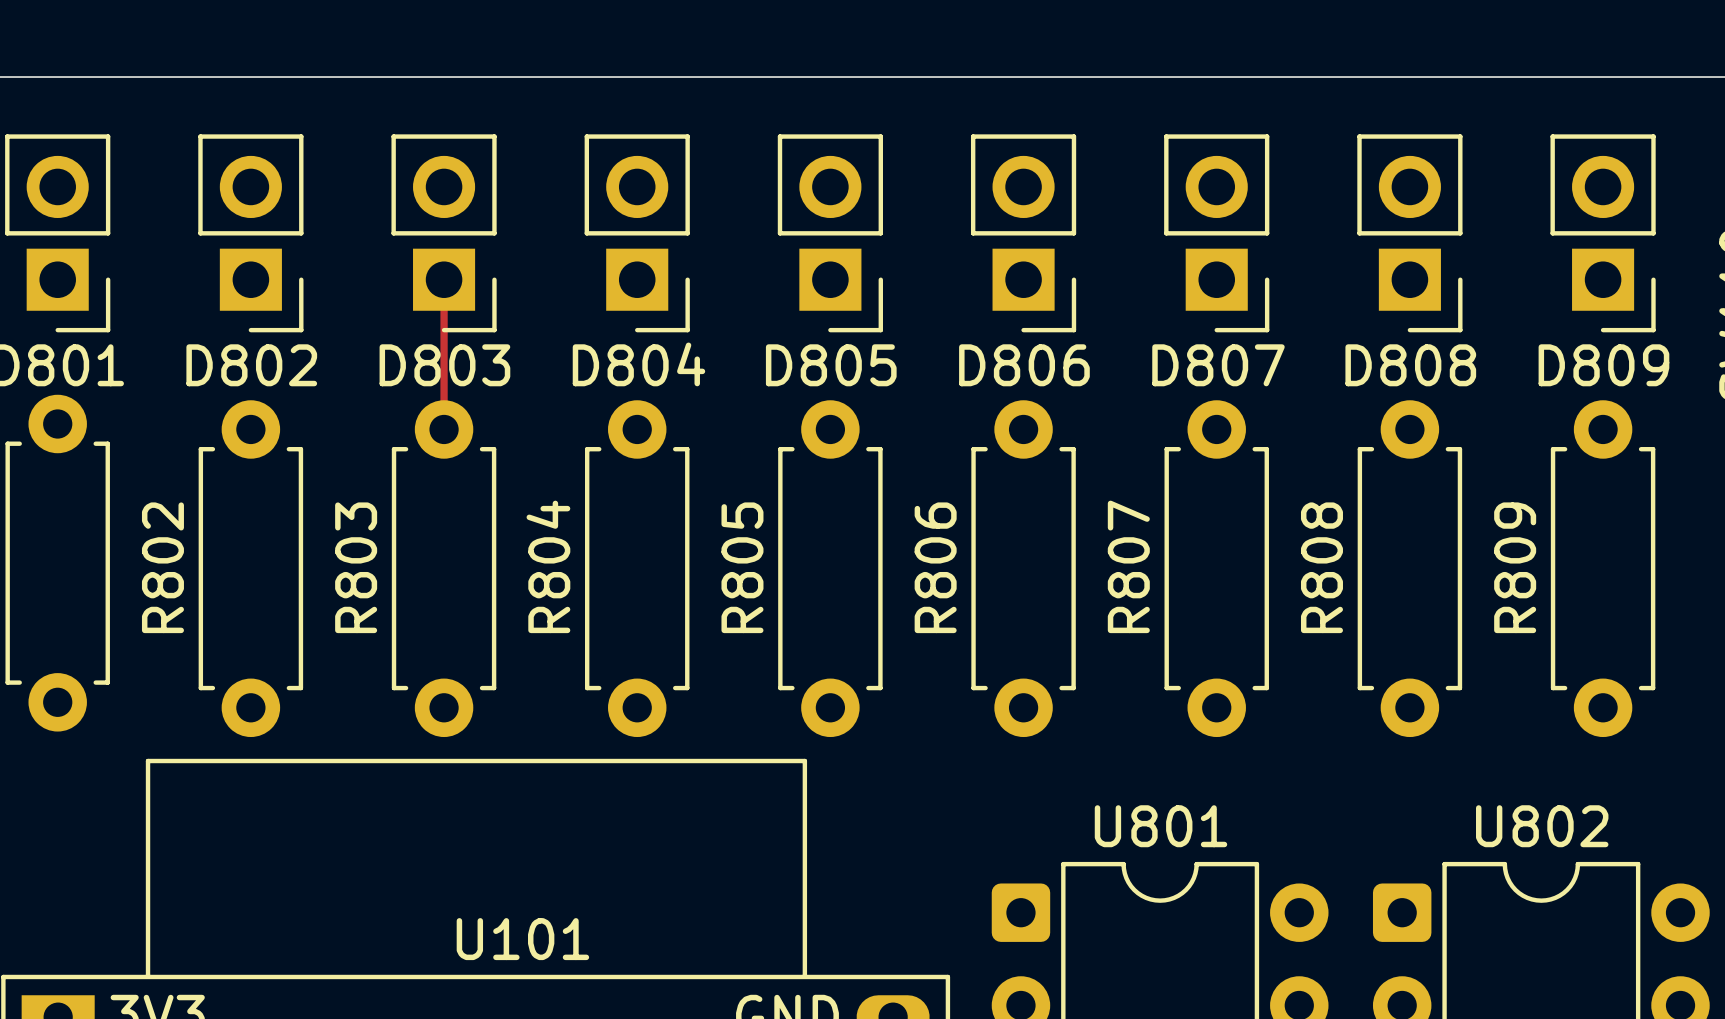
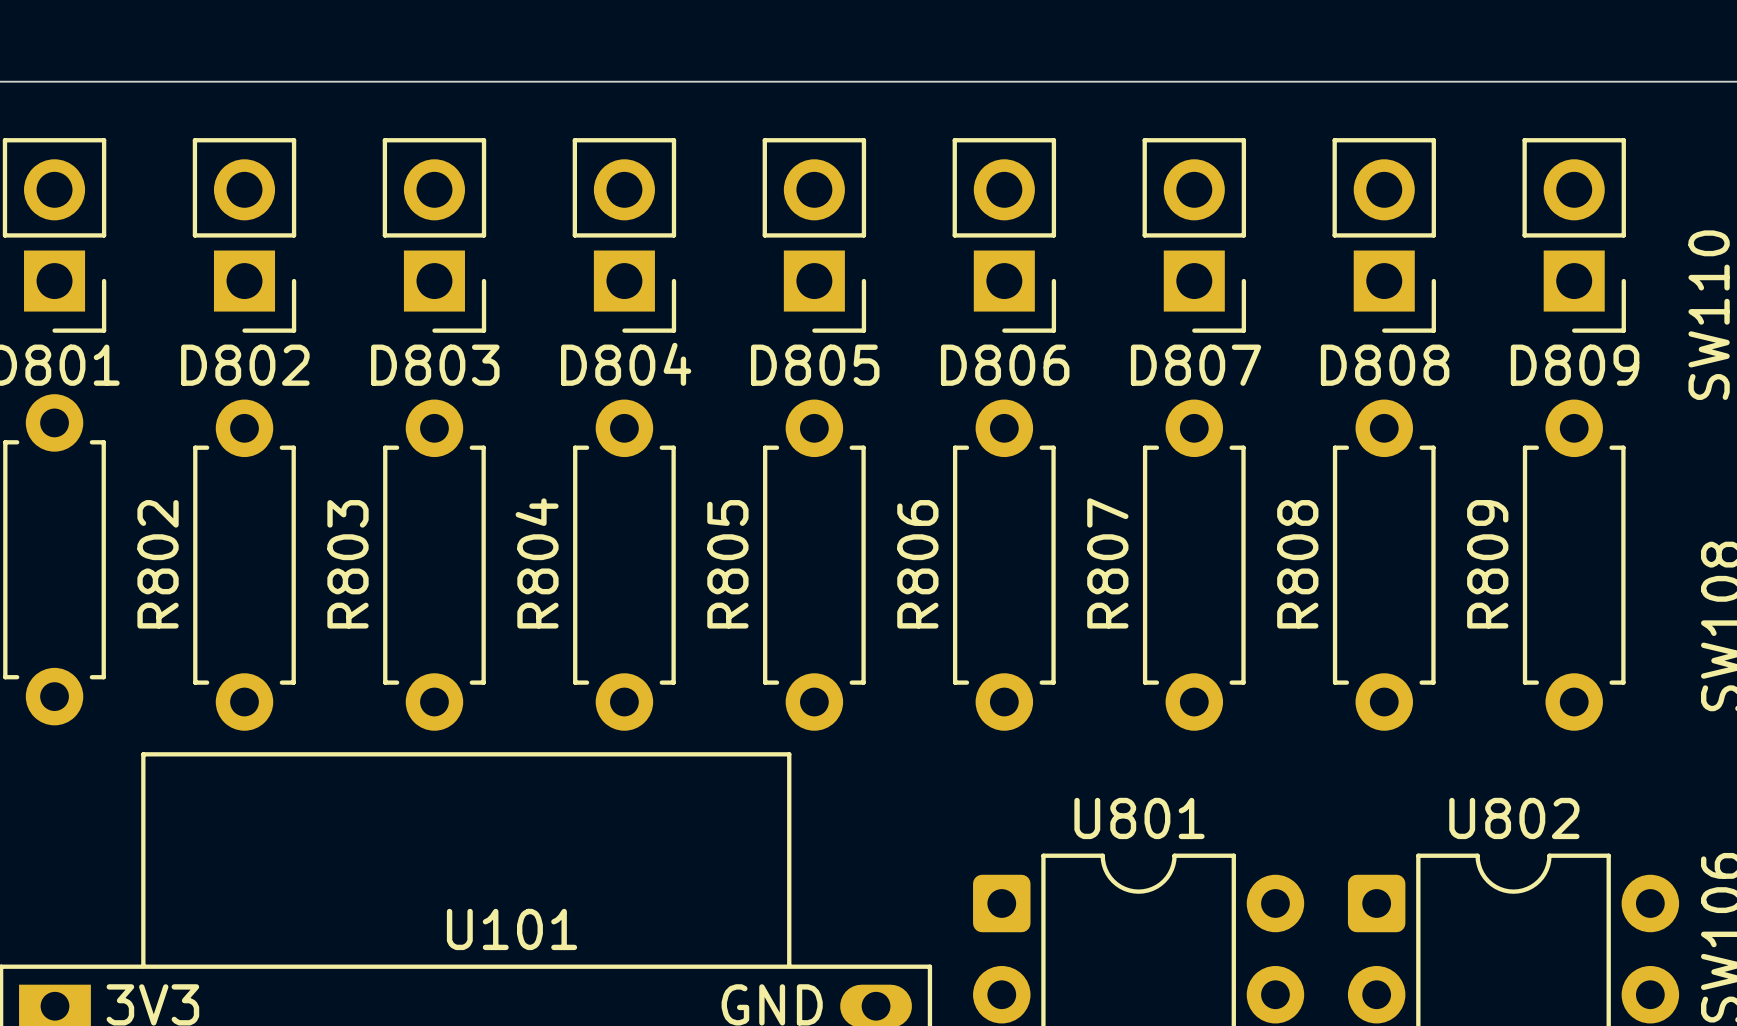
track: (444, 279) (444, 429) -> none

